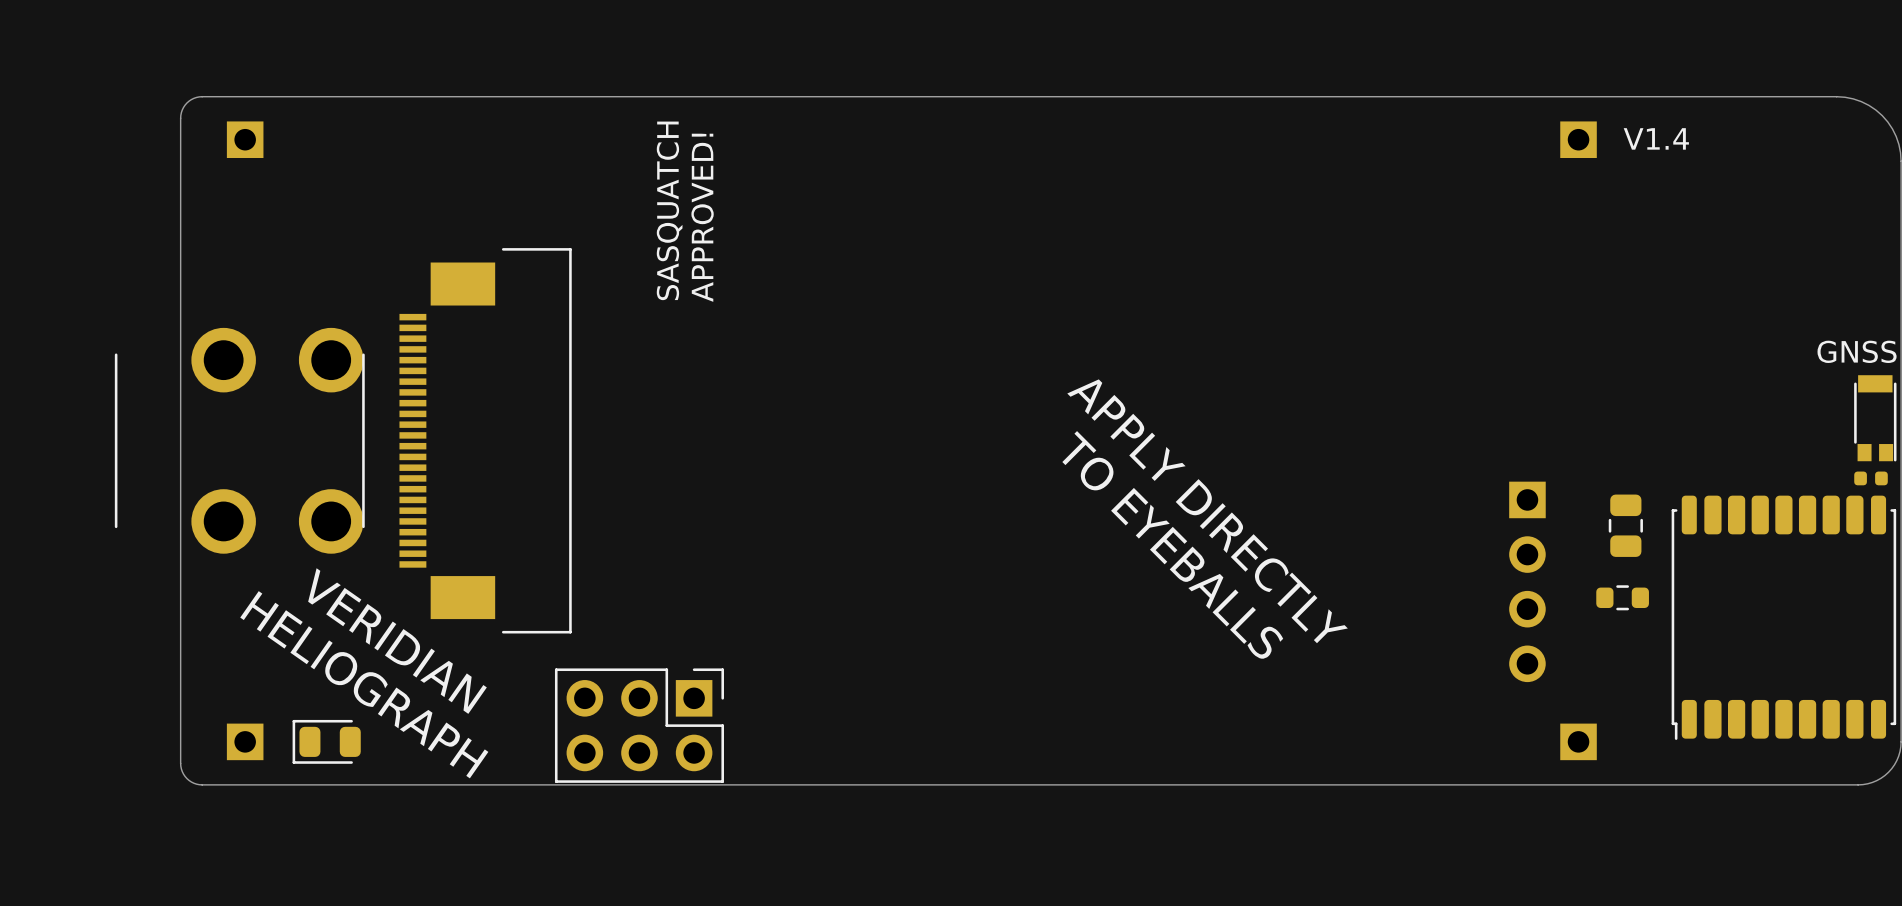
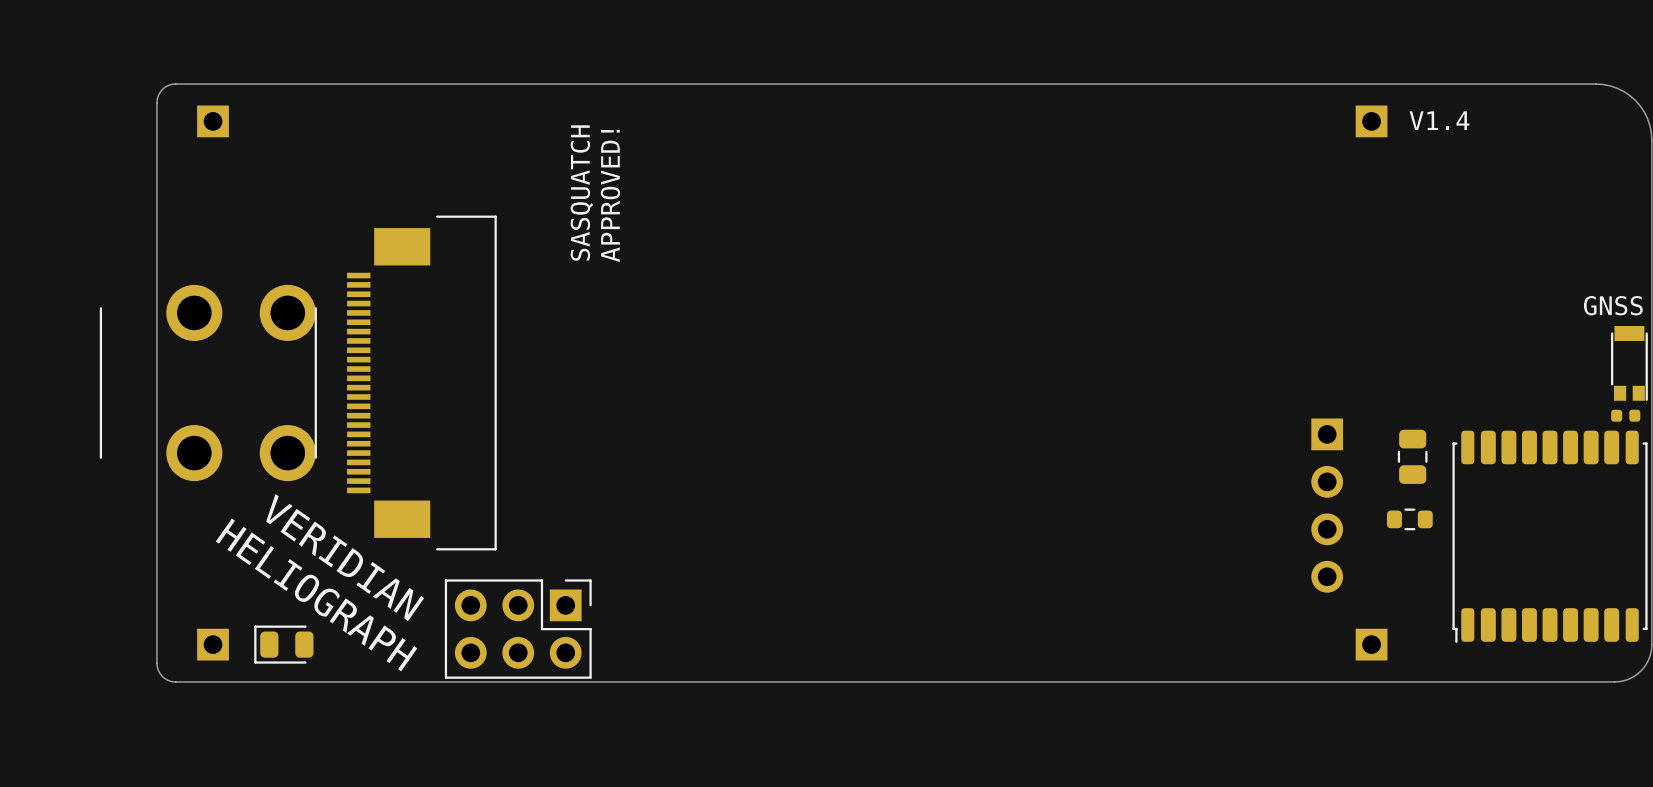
text: APPLY DIRECTLY (1207, 511) -> none
text: TO EYEBALLS (1172, 545) -> none
part position: (639, 725) -> (518, 629)

